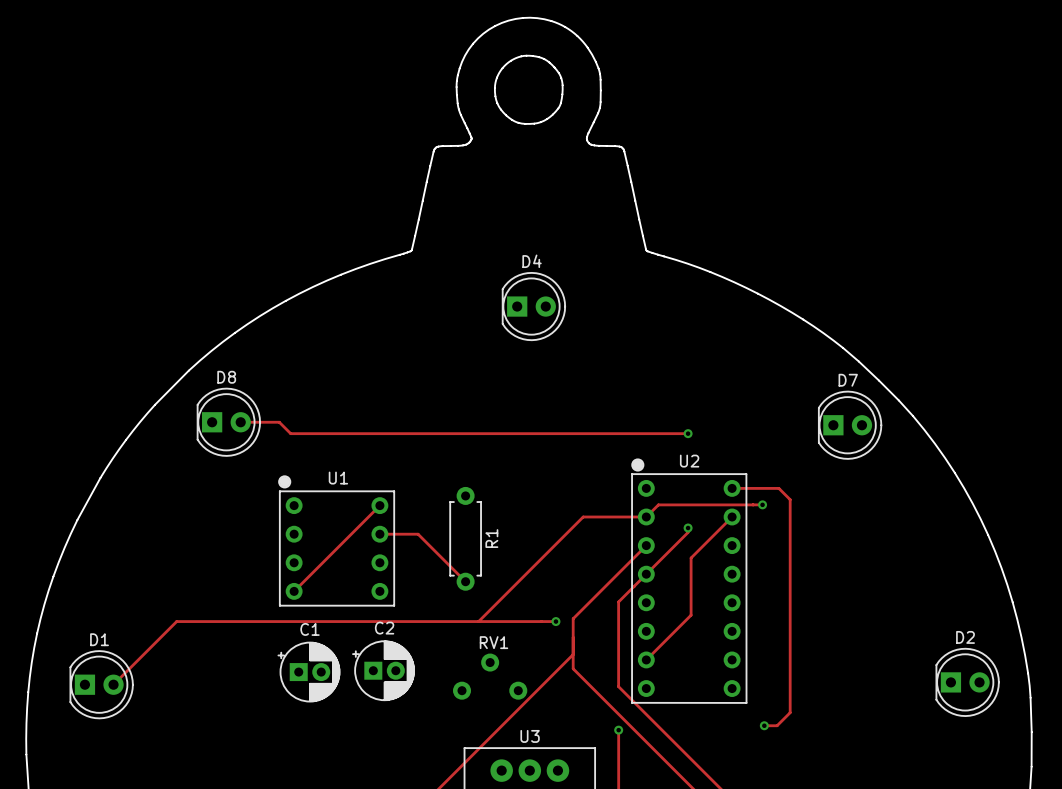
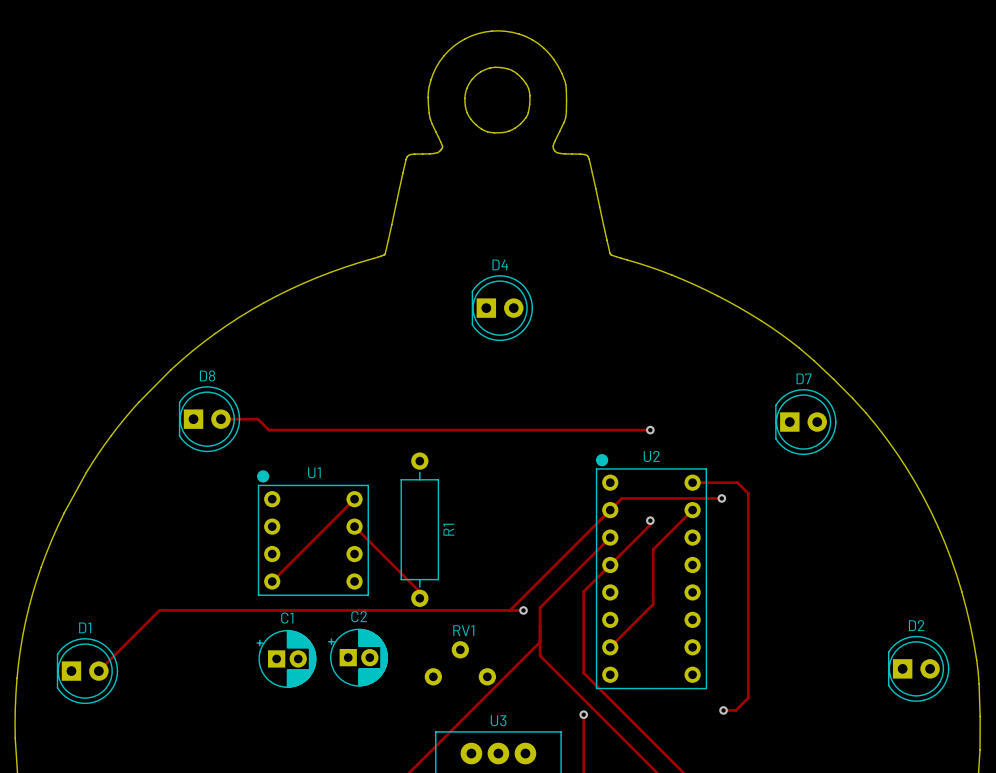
R1 footprint: [449, 486, 482, 591] -> [400, 452, 440, 607]
track: (646, 517) (583, 517) (478, 621) -> (610, 510) (509, 610)
track: (379, 534) (418, 534) (465, 581) -> (354, 526) (419, 591) (419, 598)

